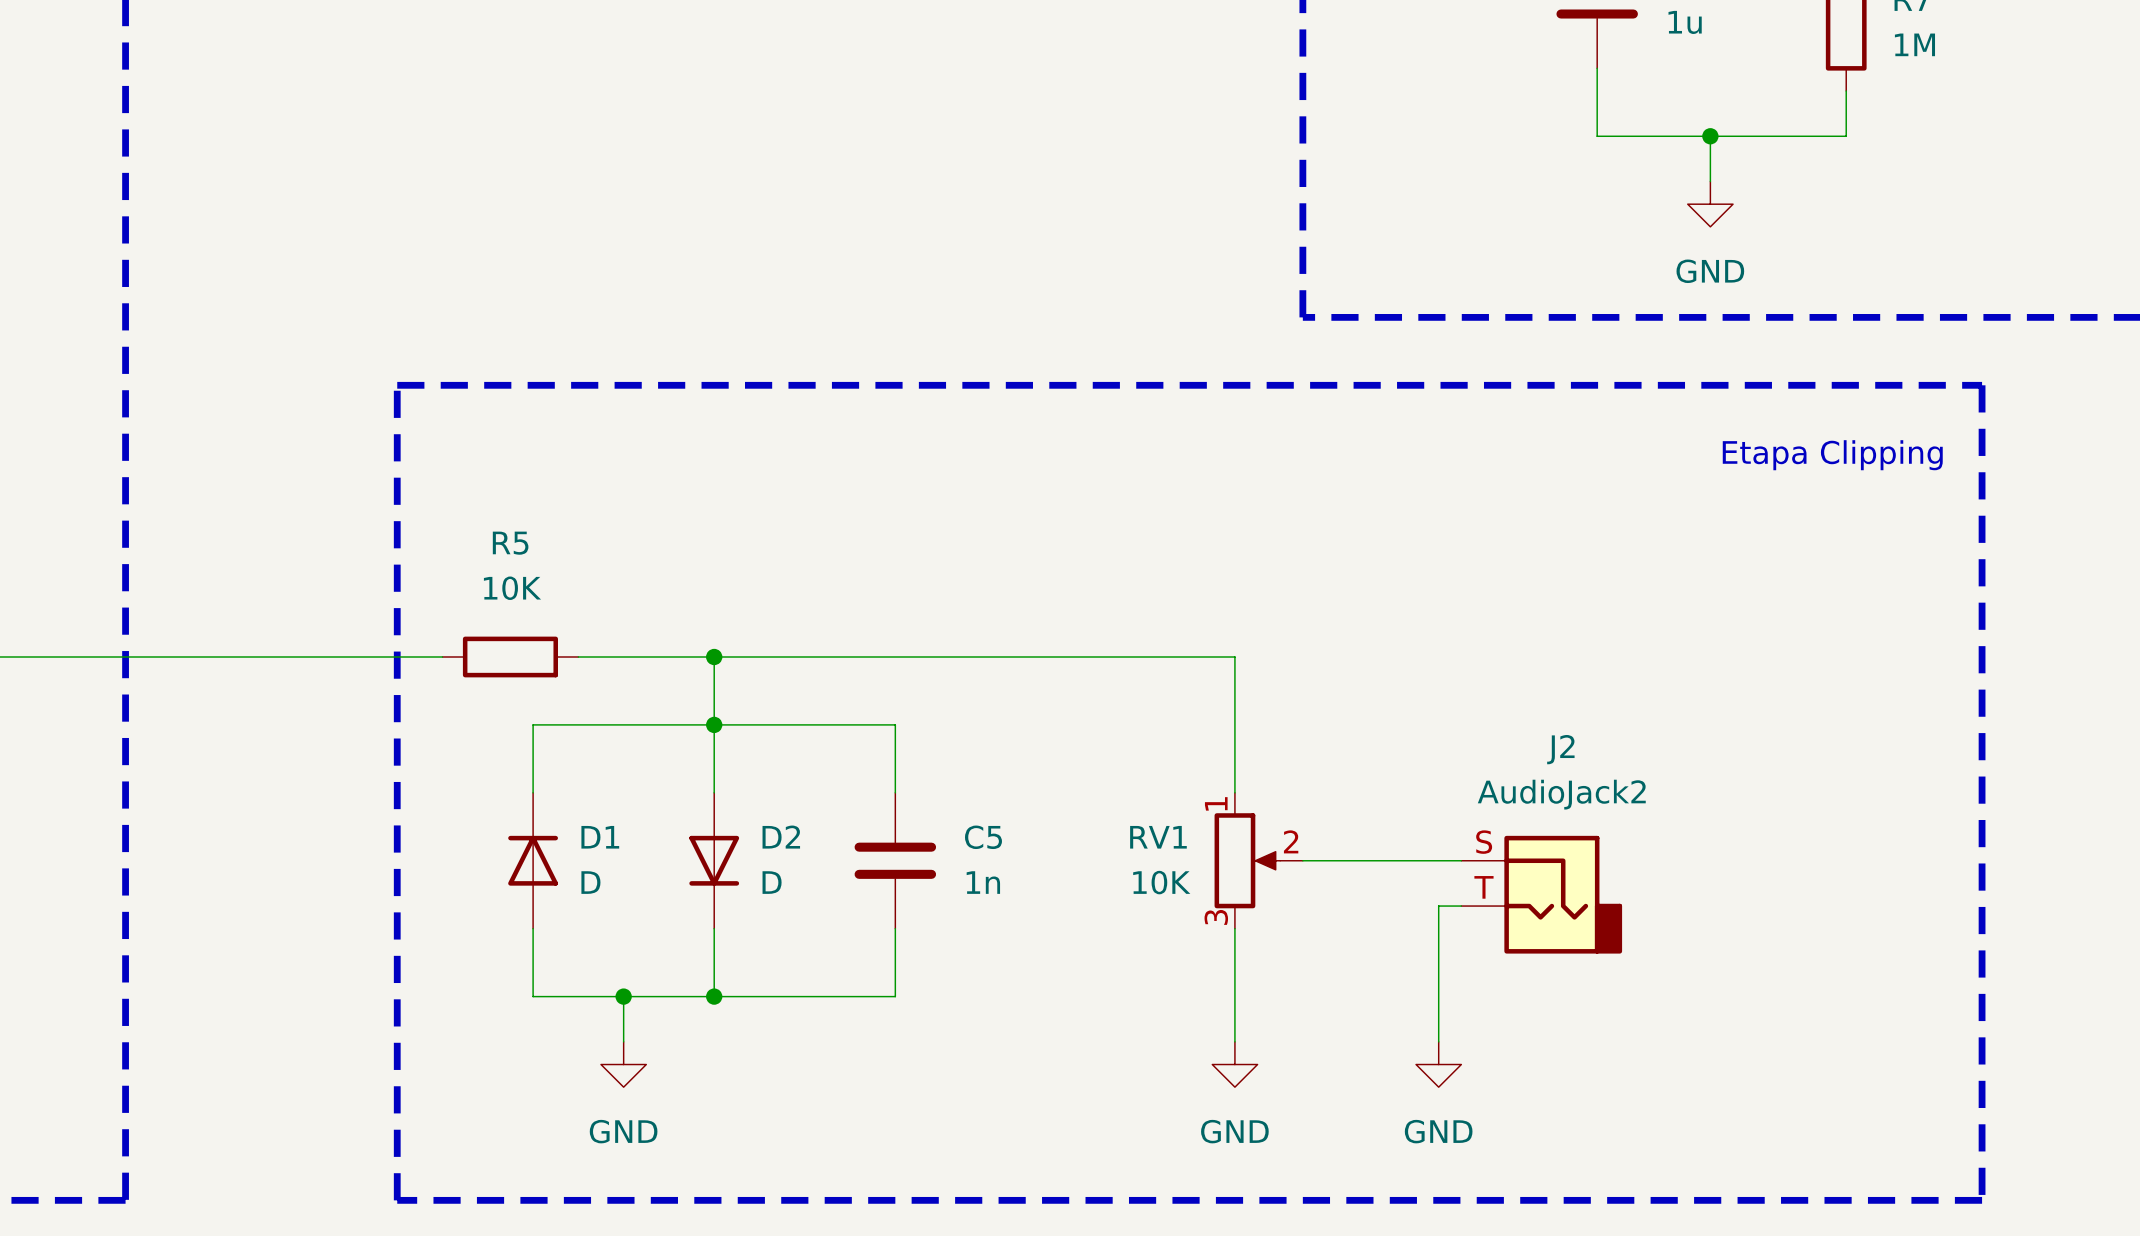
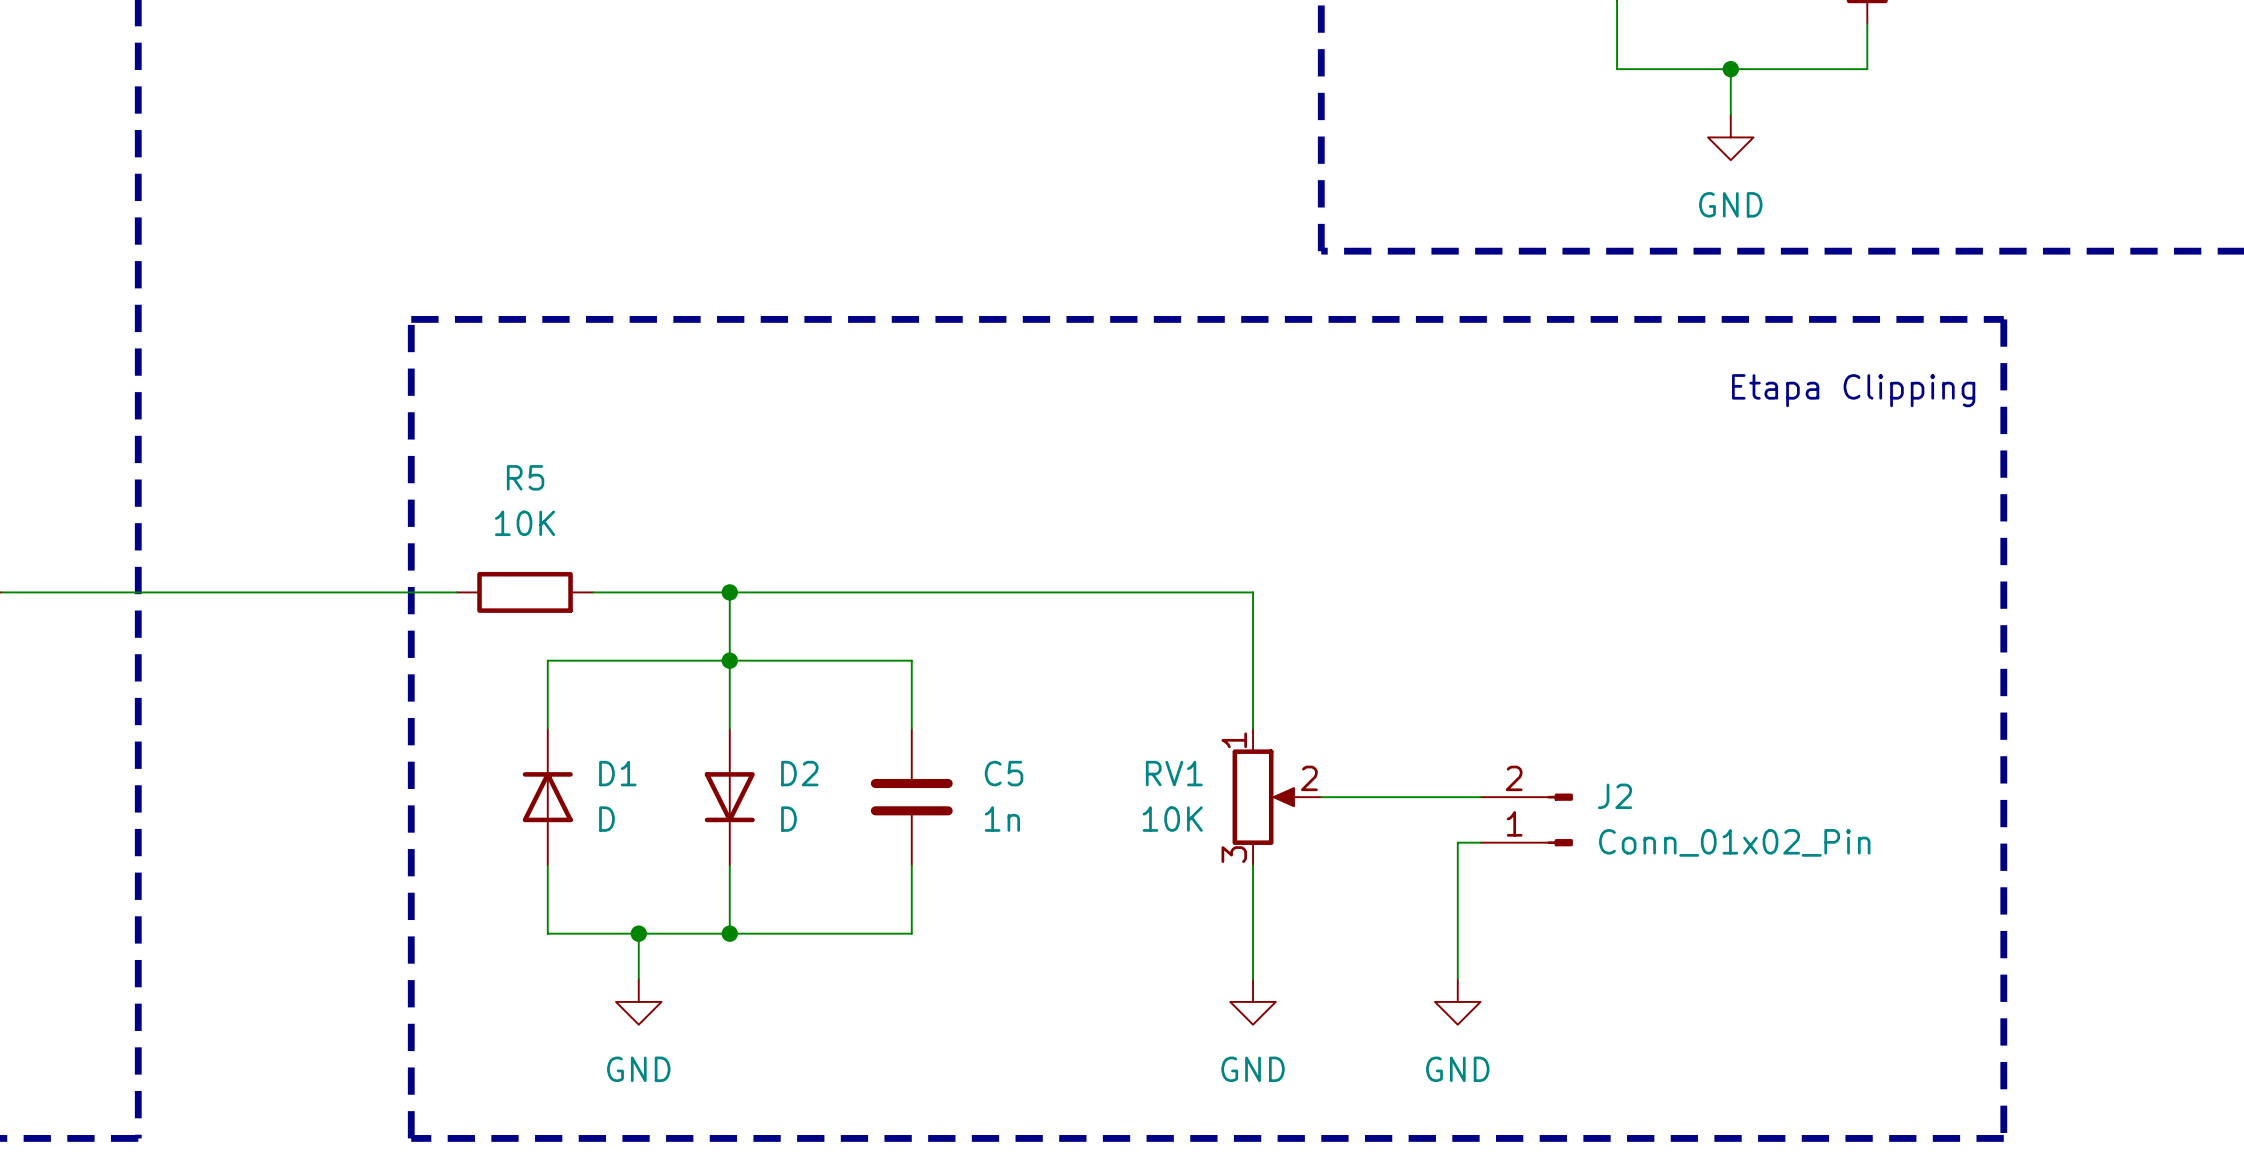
J2 name position: J2 (1560, 749) -> J2 (1615, 796)
J2 value: AudioJack2 (1561, 794) -> Conn_01x02_Pin (1734, 842)
J2 symbol: [1461, 835, 1623, 954] -> [1480, 793, 1573, 847]

